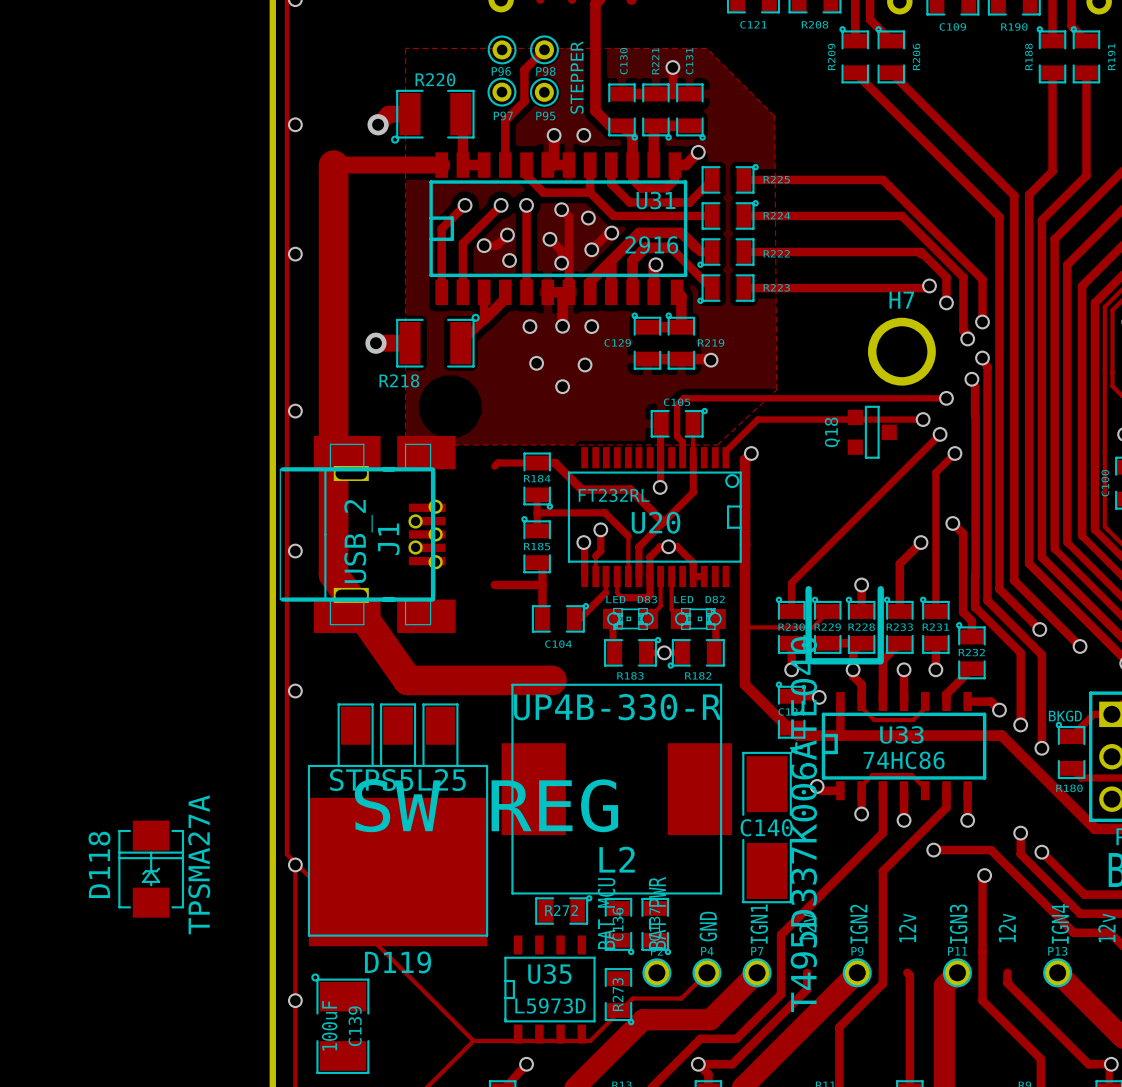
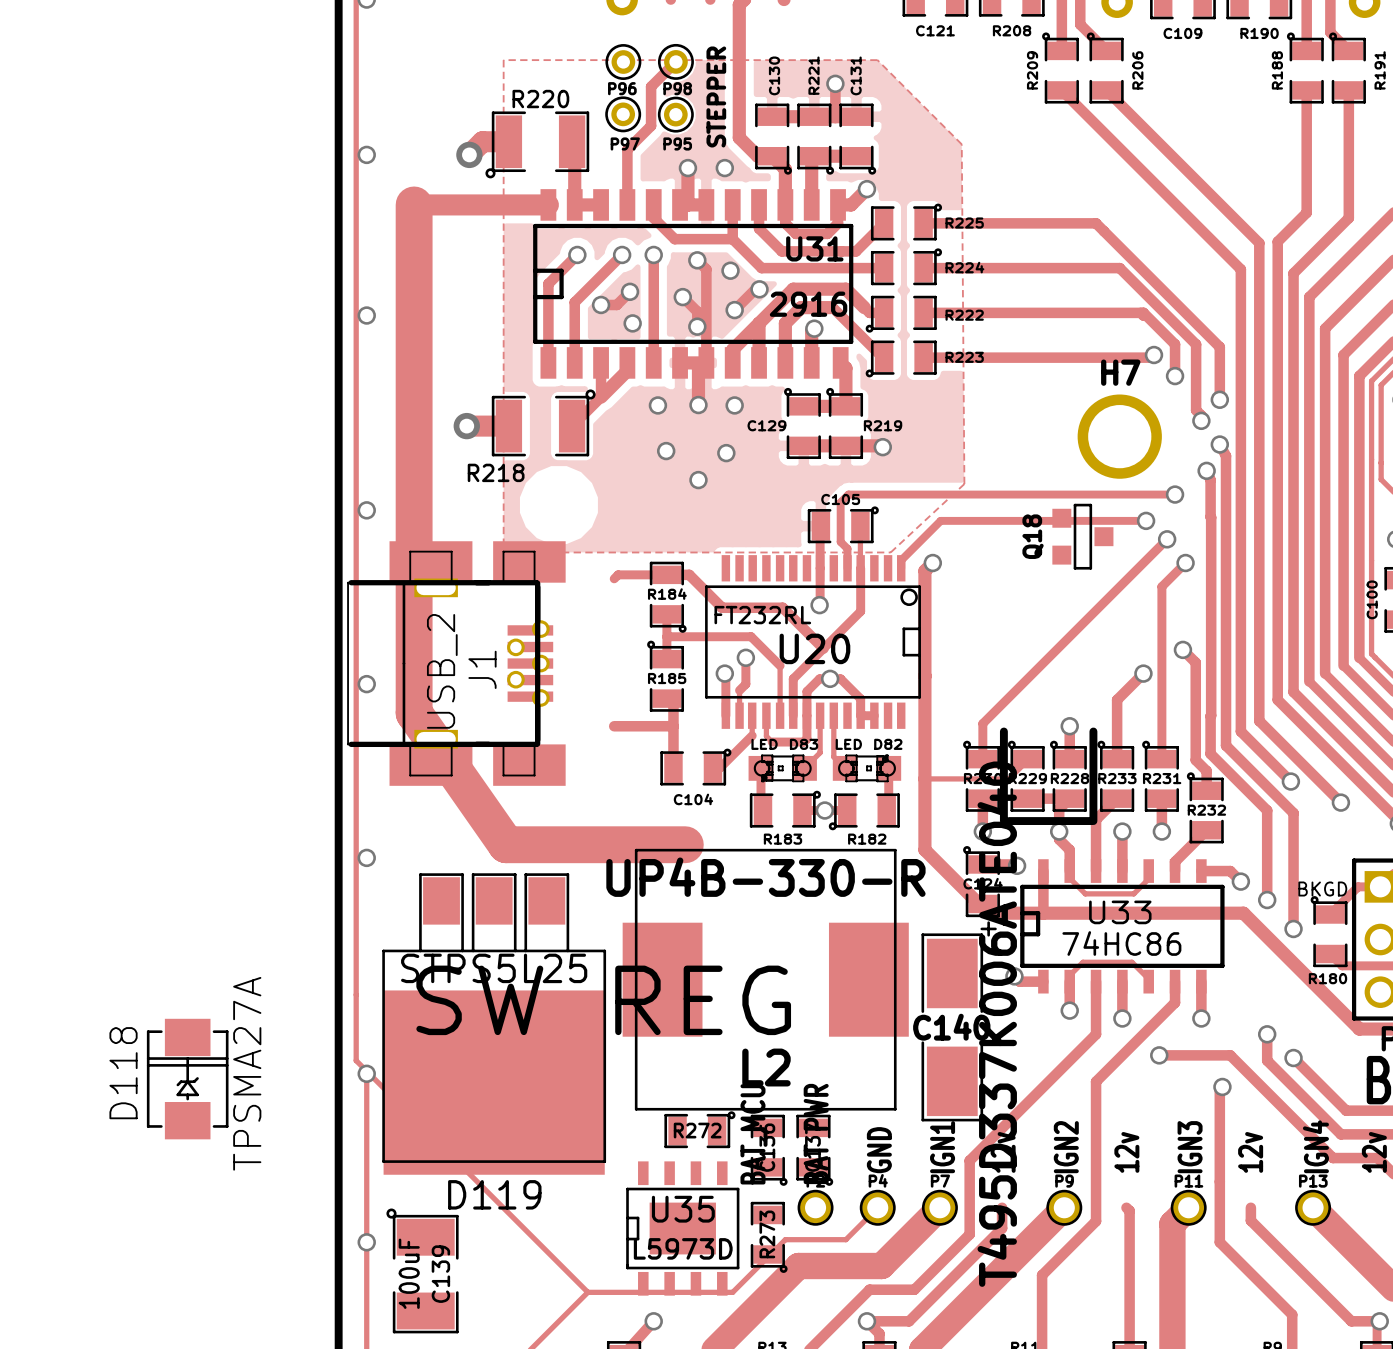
U35 footprint: [504, 935, 596, 1044] -> [626, 1161, 740, 1296]

